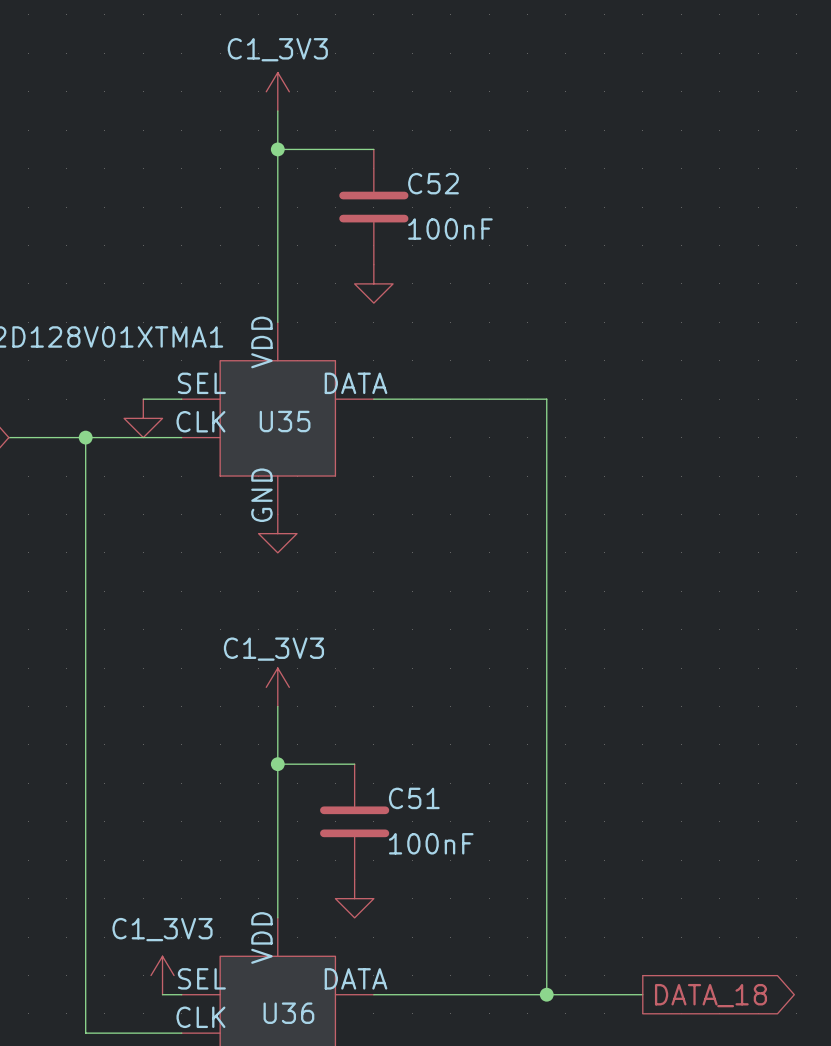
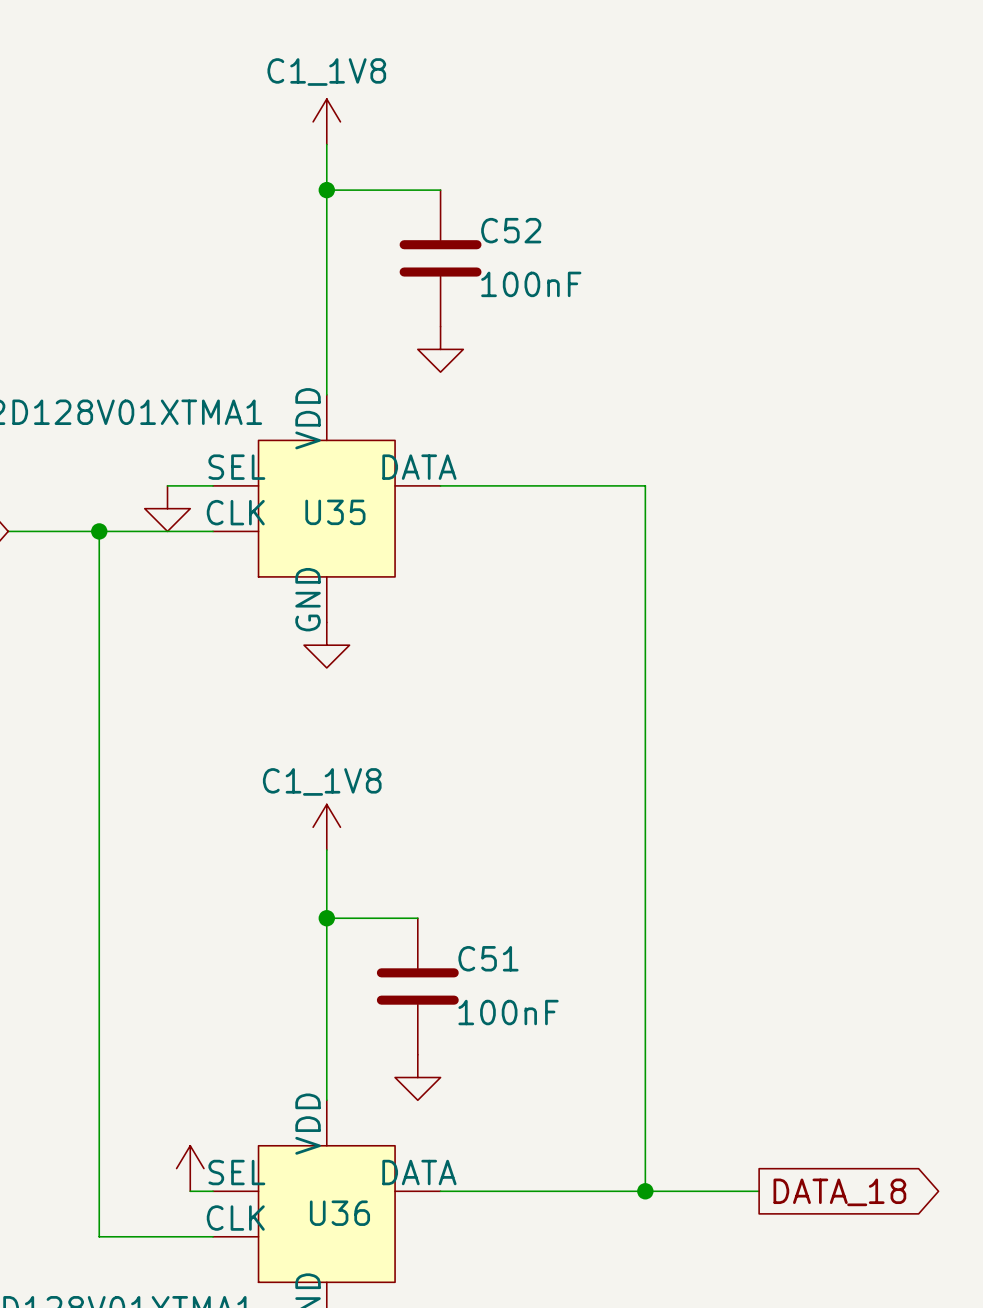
power symbol: C1_3V3 (277, 91) -> C1_1V8 (326, 121)
power symbol: C1_3V3 (277, 687) -> C1_1V8 (326, 827)
power symbol text: C1_3V3 (162, 929) -> none

